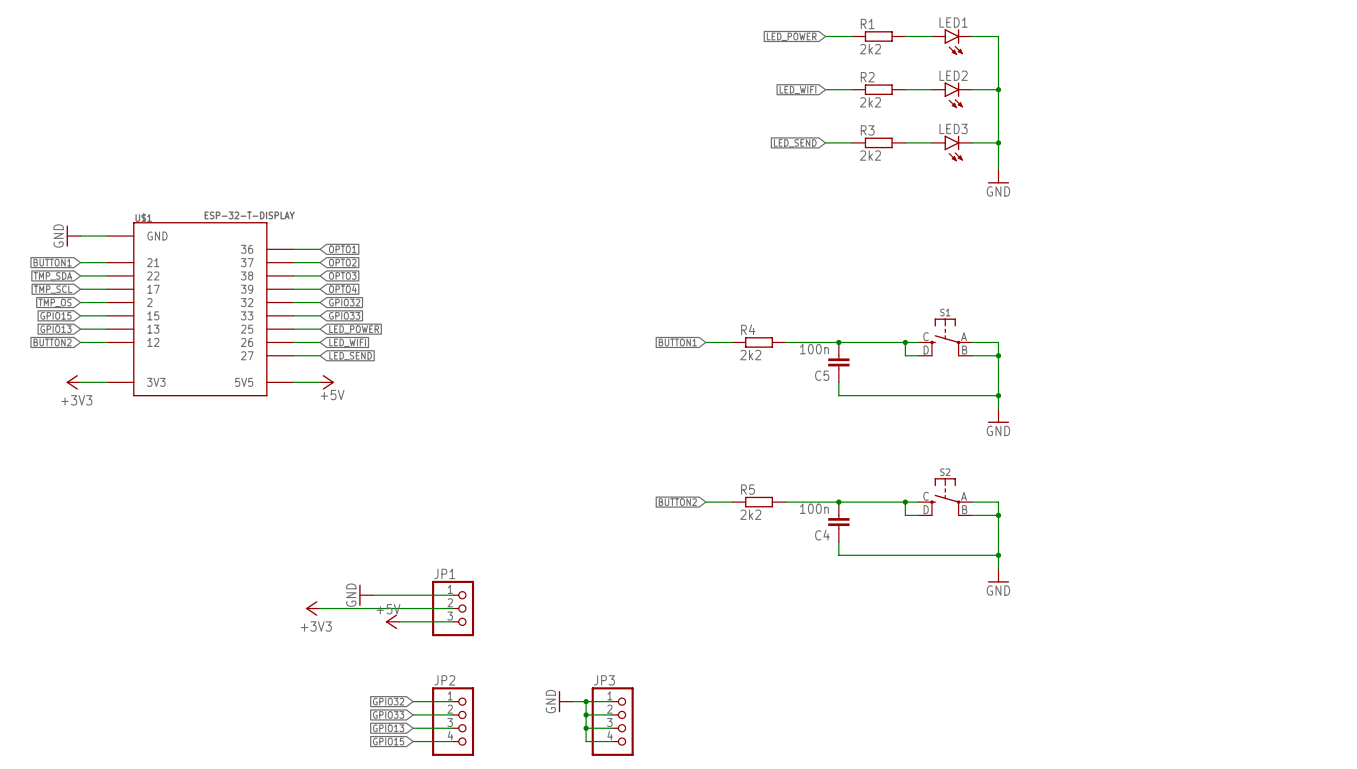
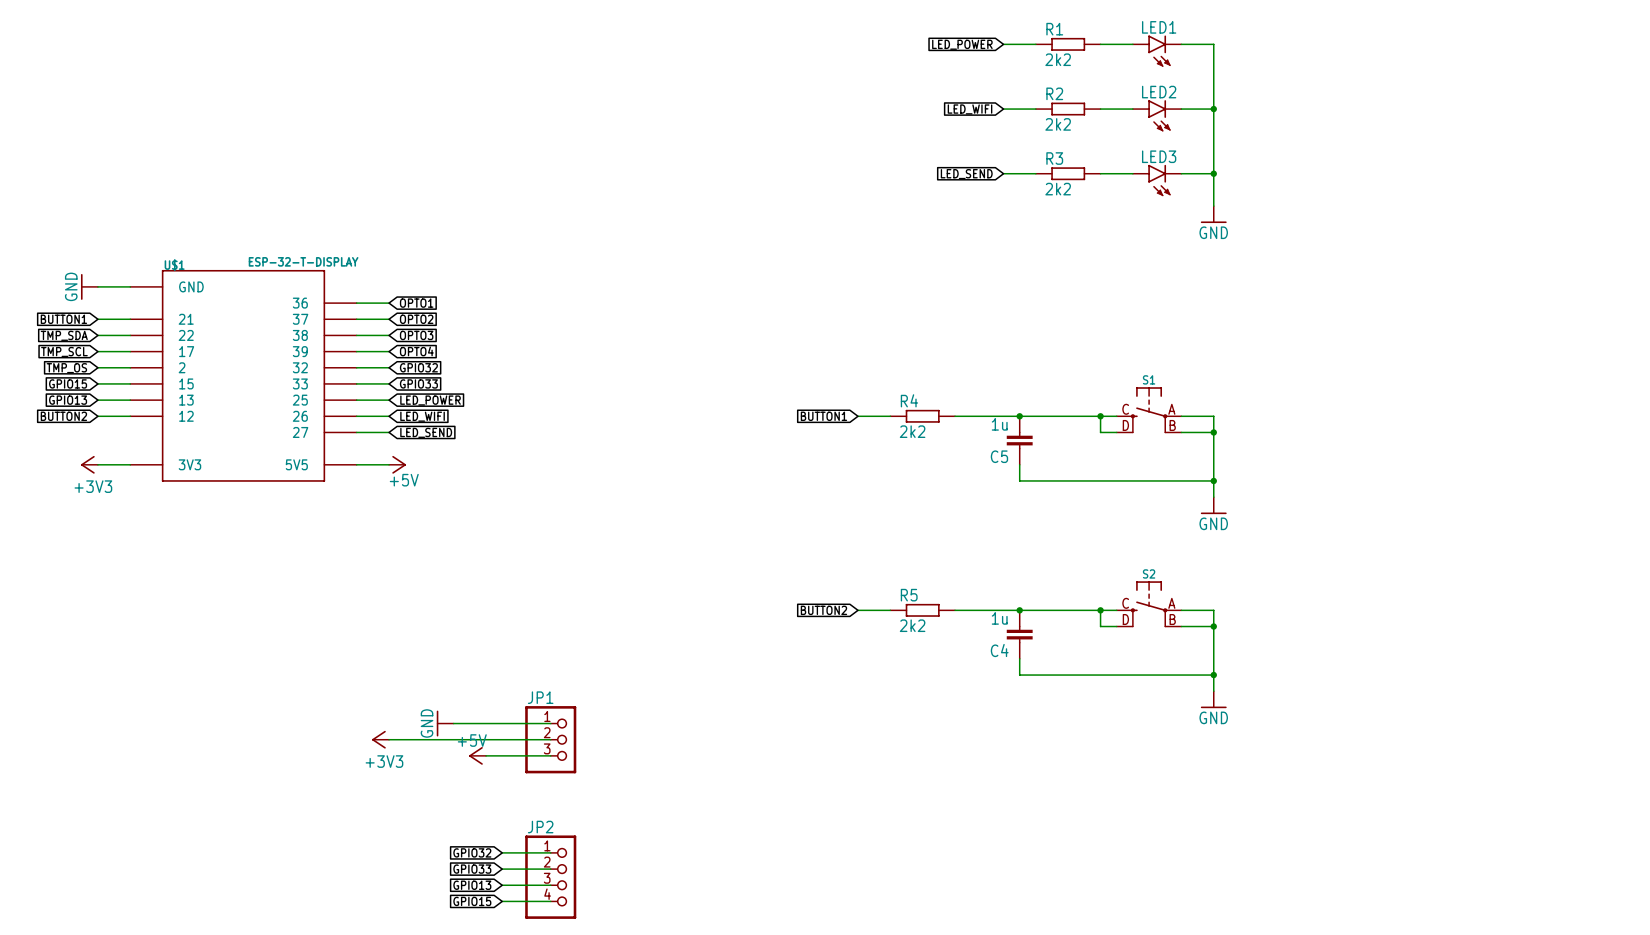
C5 value: 100n (814, 349) -> 1u (999, 424)
C4 value: 100n (814, 508) -> 1u (999, 618)
power symbol: GND (565, 701) -> none
wire: (572, 701) (612, 701) -> none
wire: (586, 701) (586, 741) (612, 741) -> none
junction: (586, 701) -> none
wire: (586, 714) (612, 714) -> none
junction: (586, 714) -> none
JP3: (612, 721) -> none
wire: (586, 728) (612, 728) -> none
junction: (586, 728) -> none

